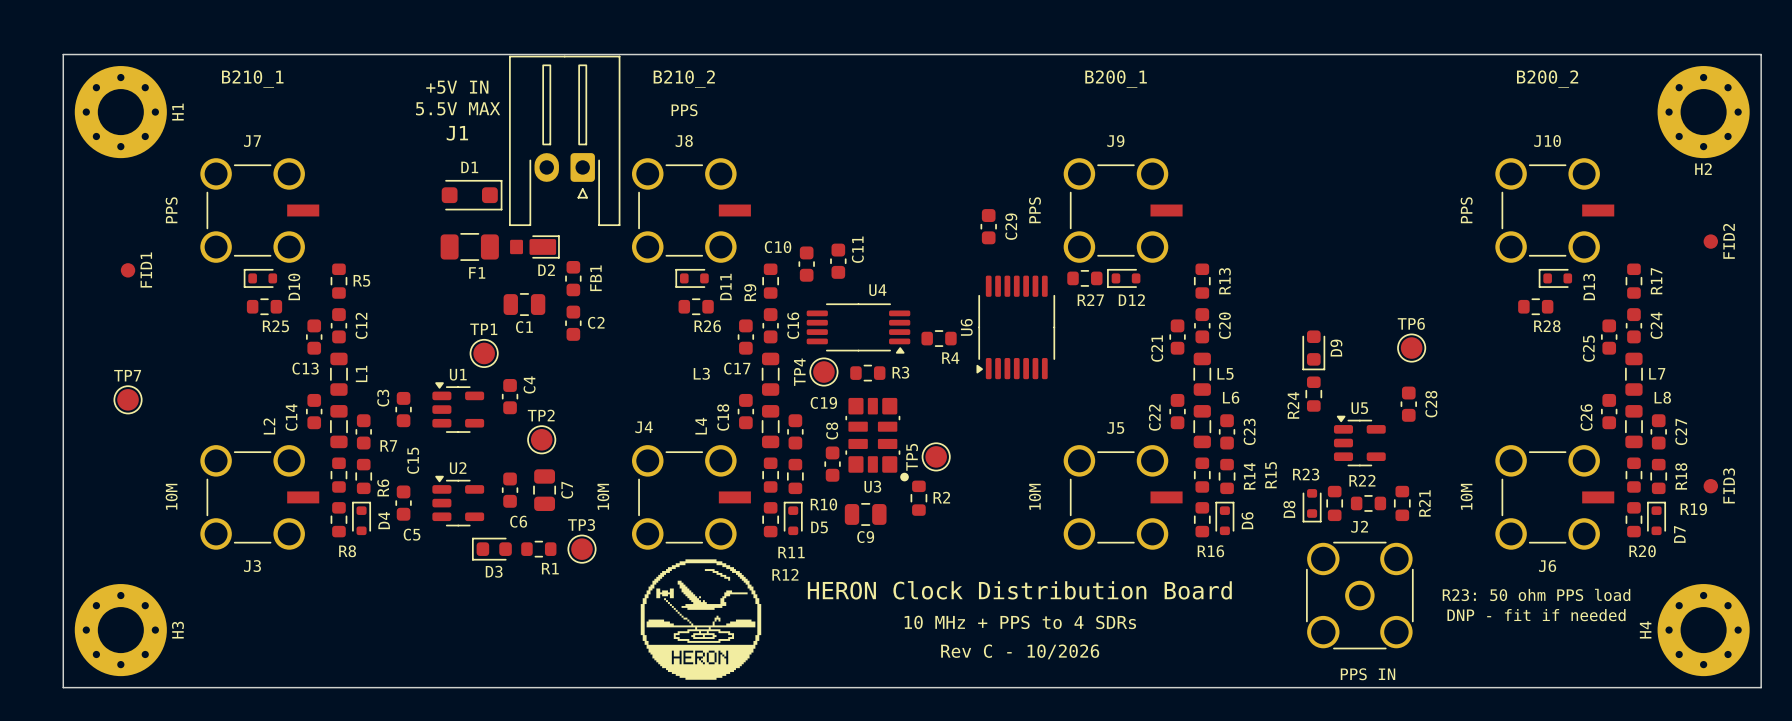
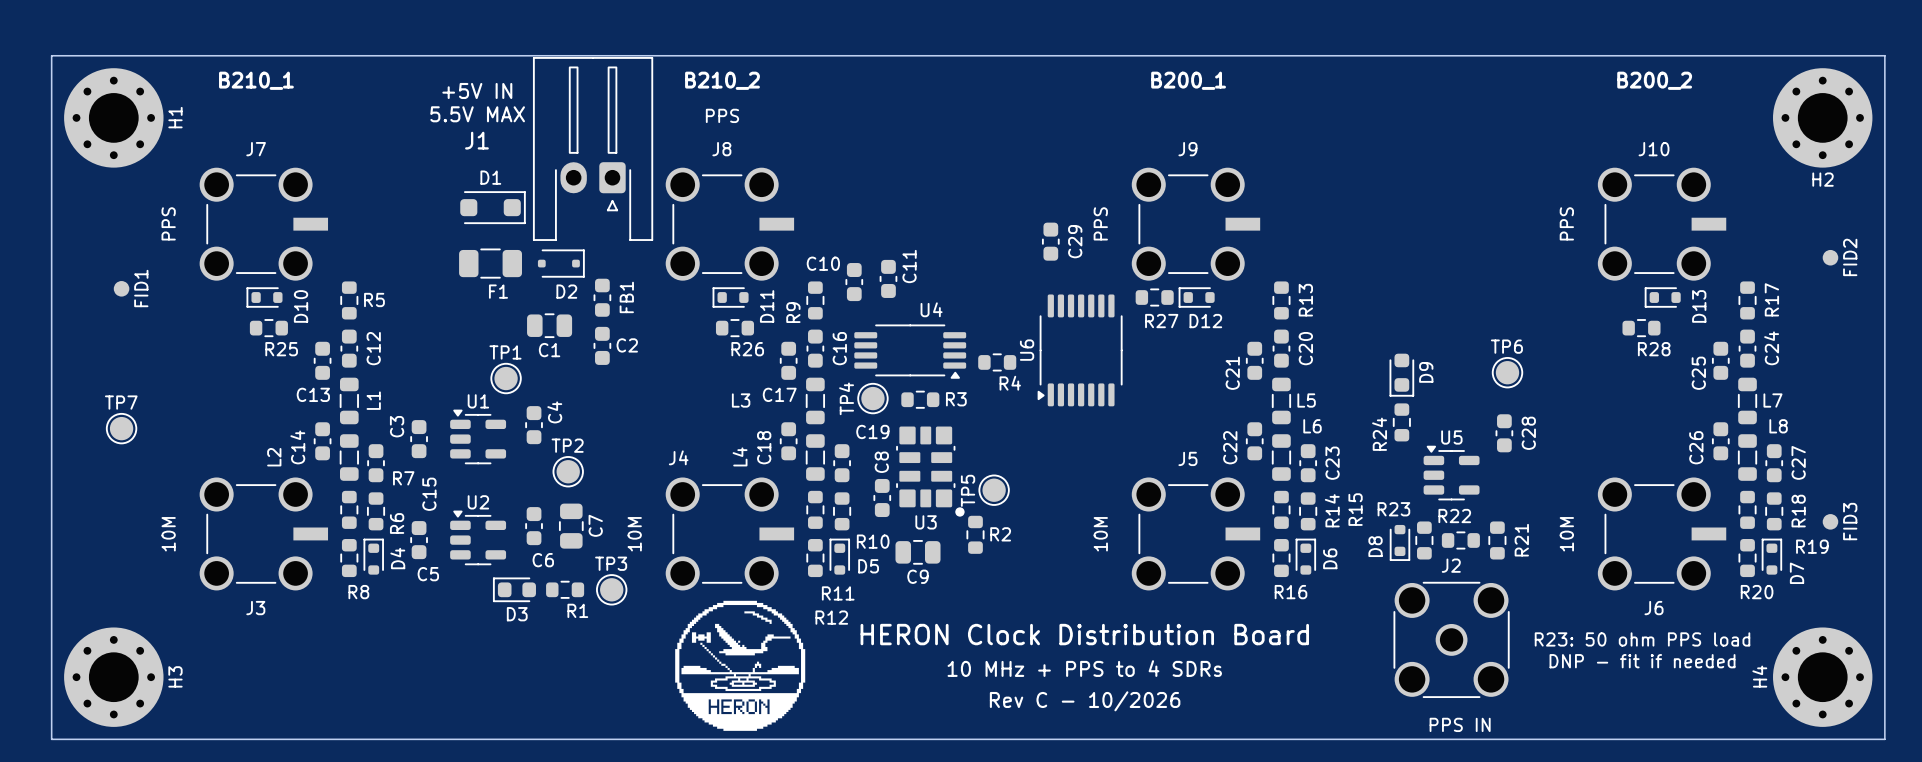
D2 footprint: [510, 235, 560, 259] -> [537, 249, 585, 278]

